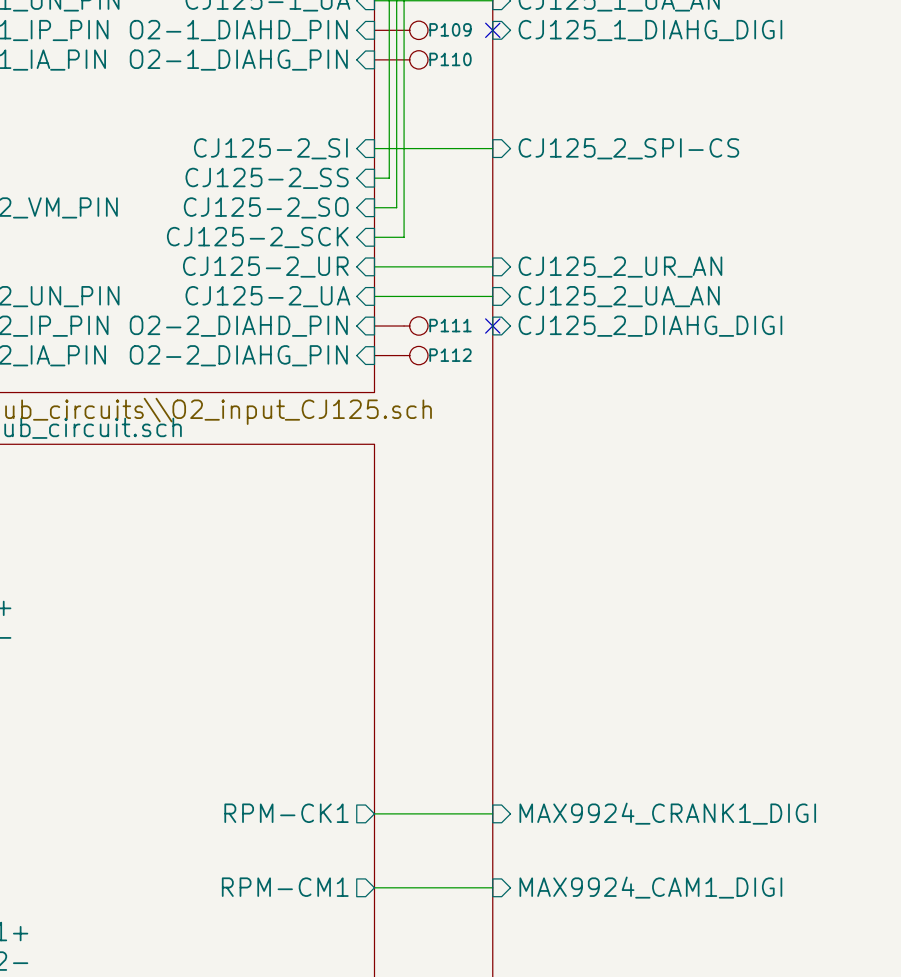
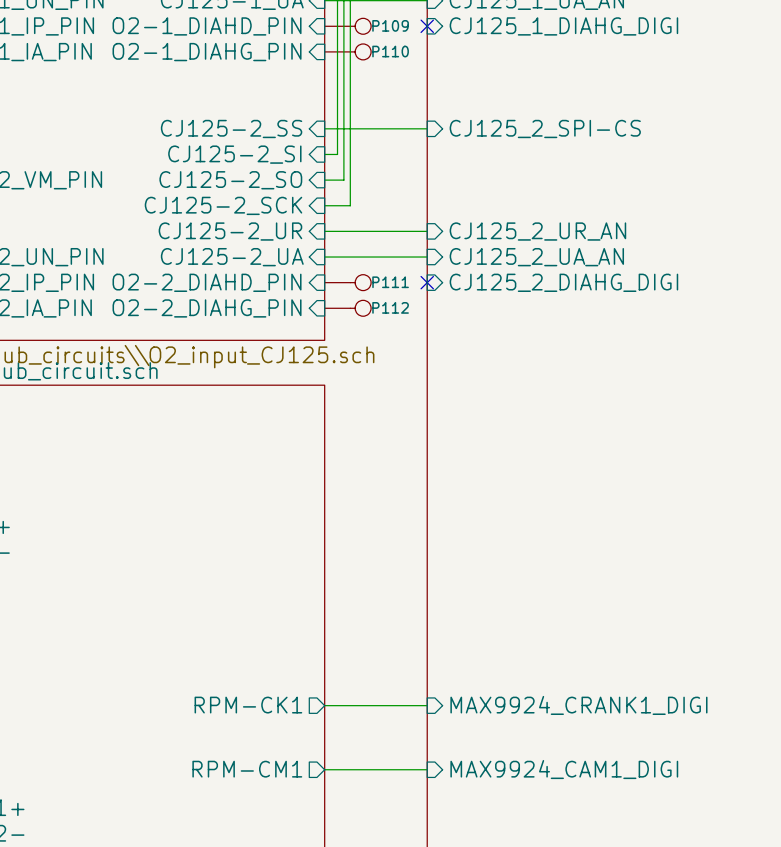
sheet pin: CJ125-2_SI (270, 148) -> CJ125-2_SS (231, 128)
sheet pin: CJ125-2_SS (267, 178) -> CJ125-2_SI (234, 154)

